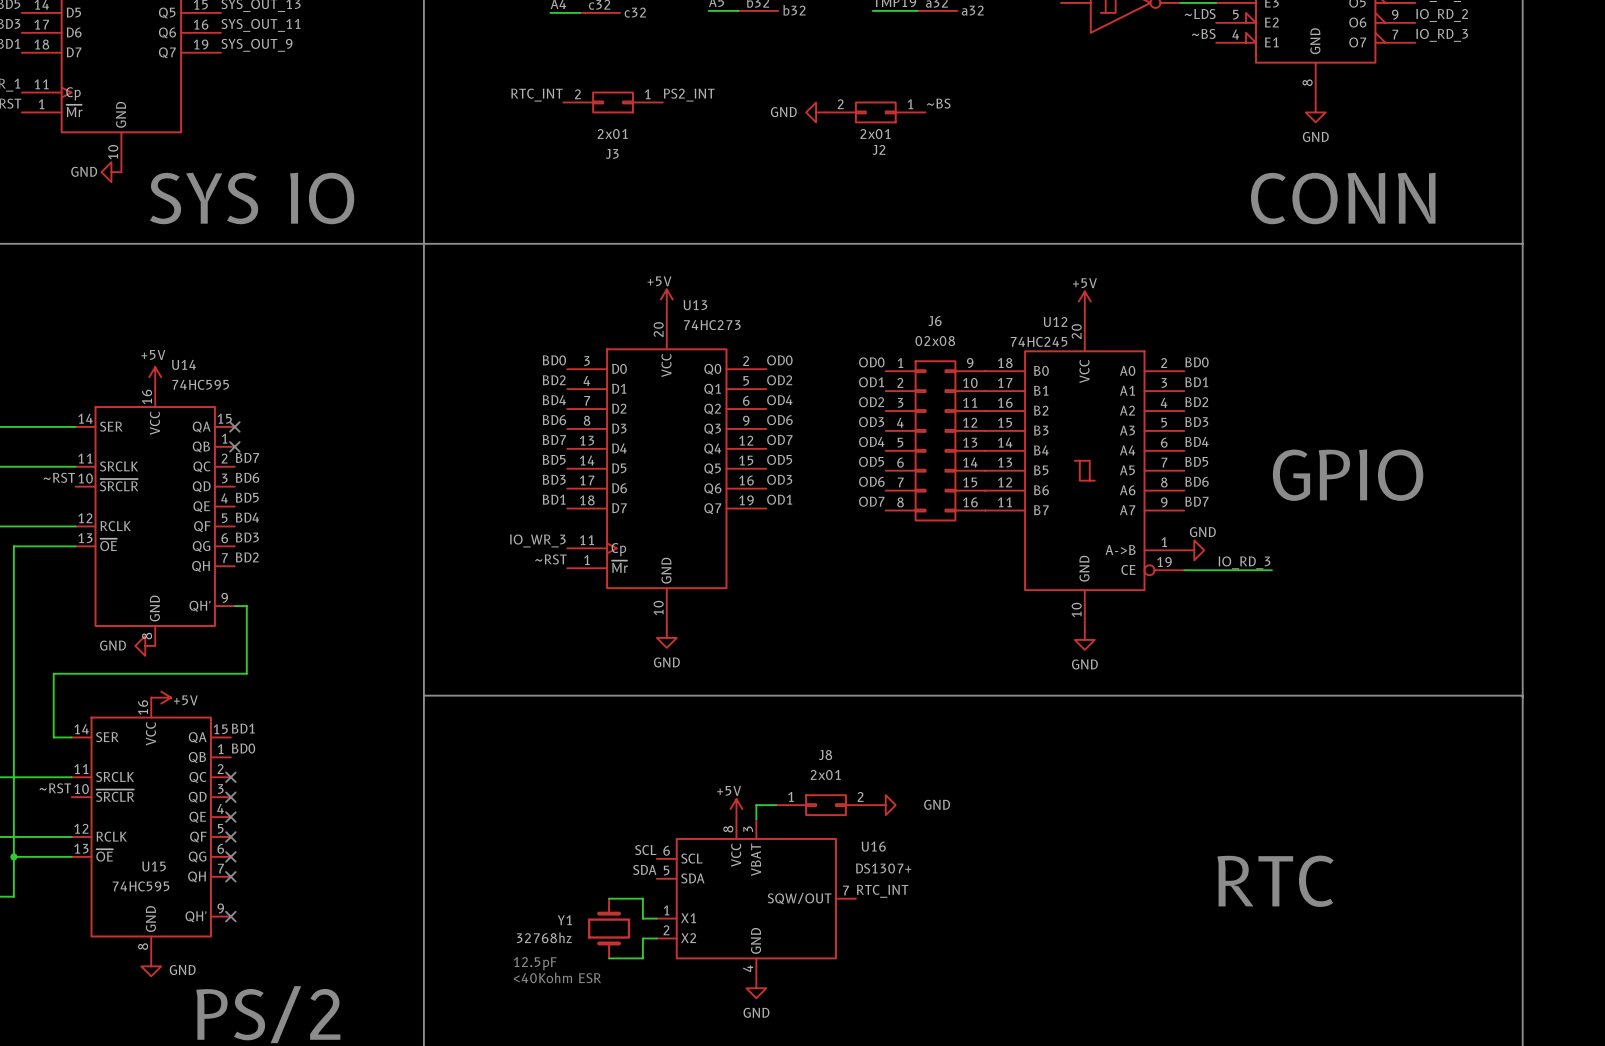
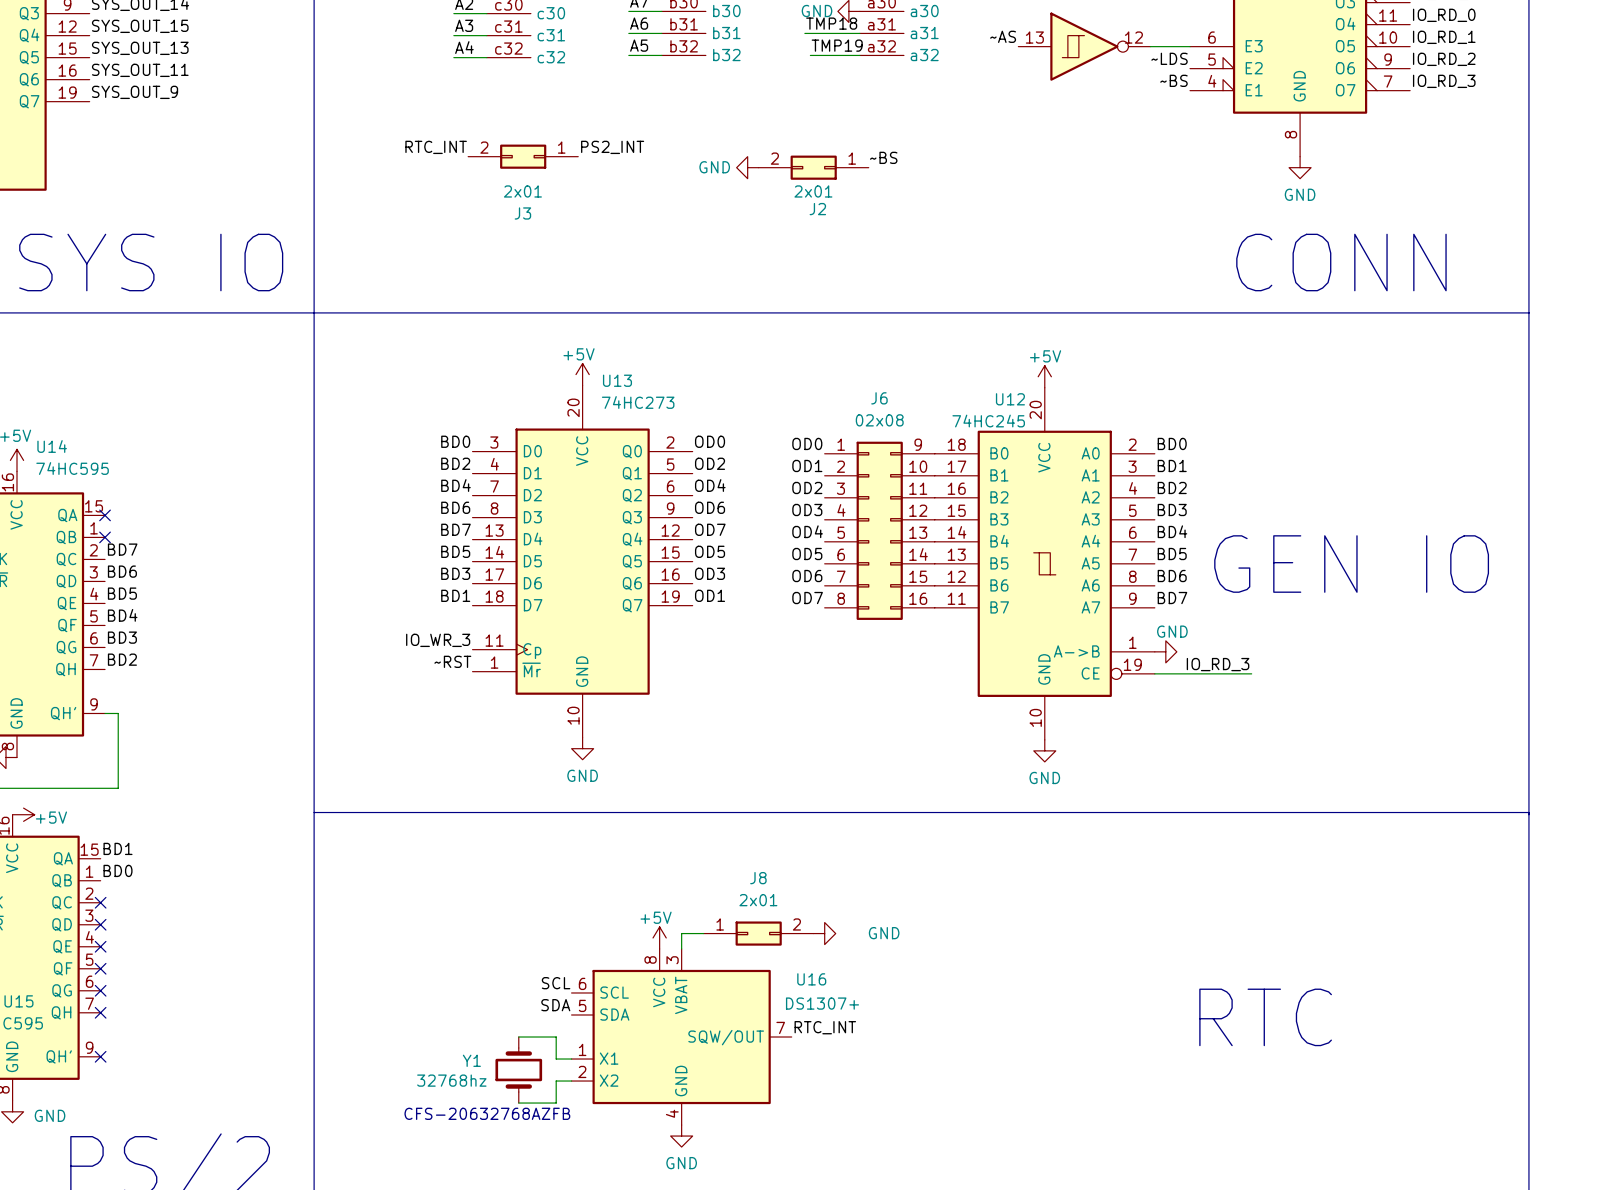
text: none -> GEN IO (1351, 564)
text: GPIO (1348, 475) -> none
text: 12.5pF (535, 963) -> none
text: none -> CFS-20632768AZFB (487, 1113)
text: <40Kohm ESR (557, 977) -> none

